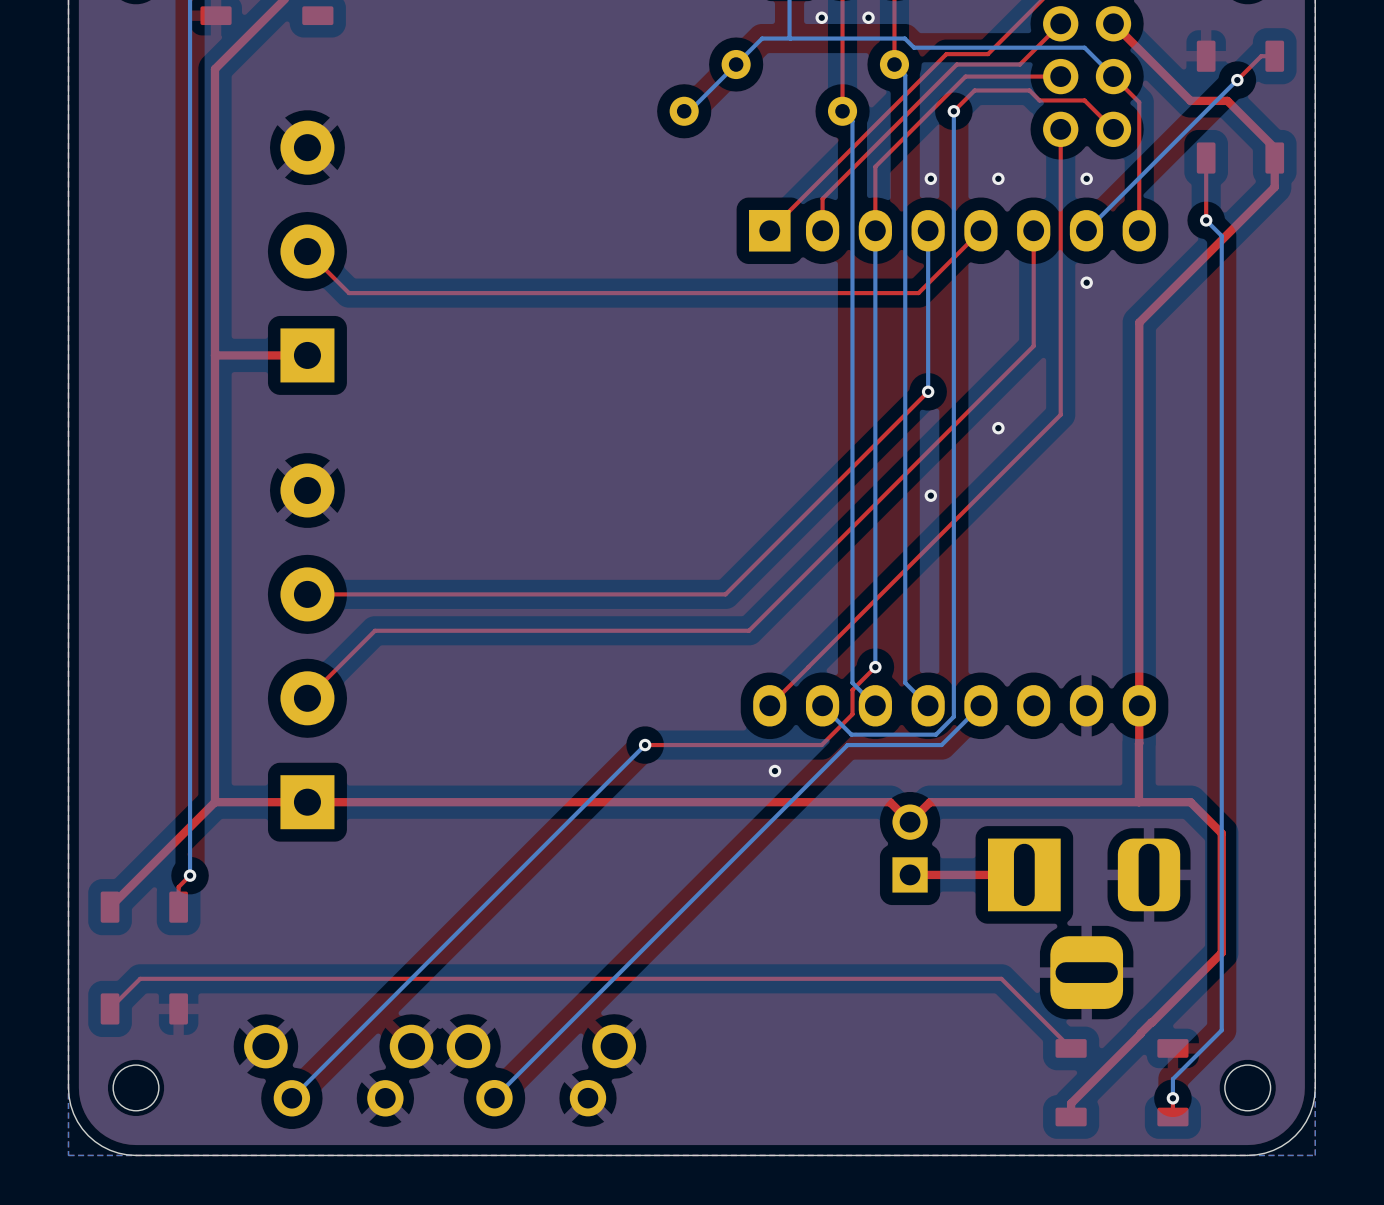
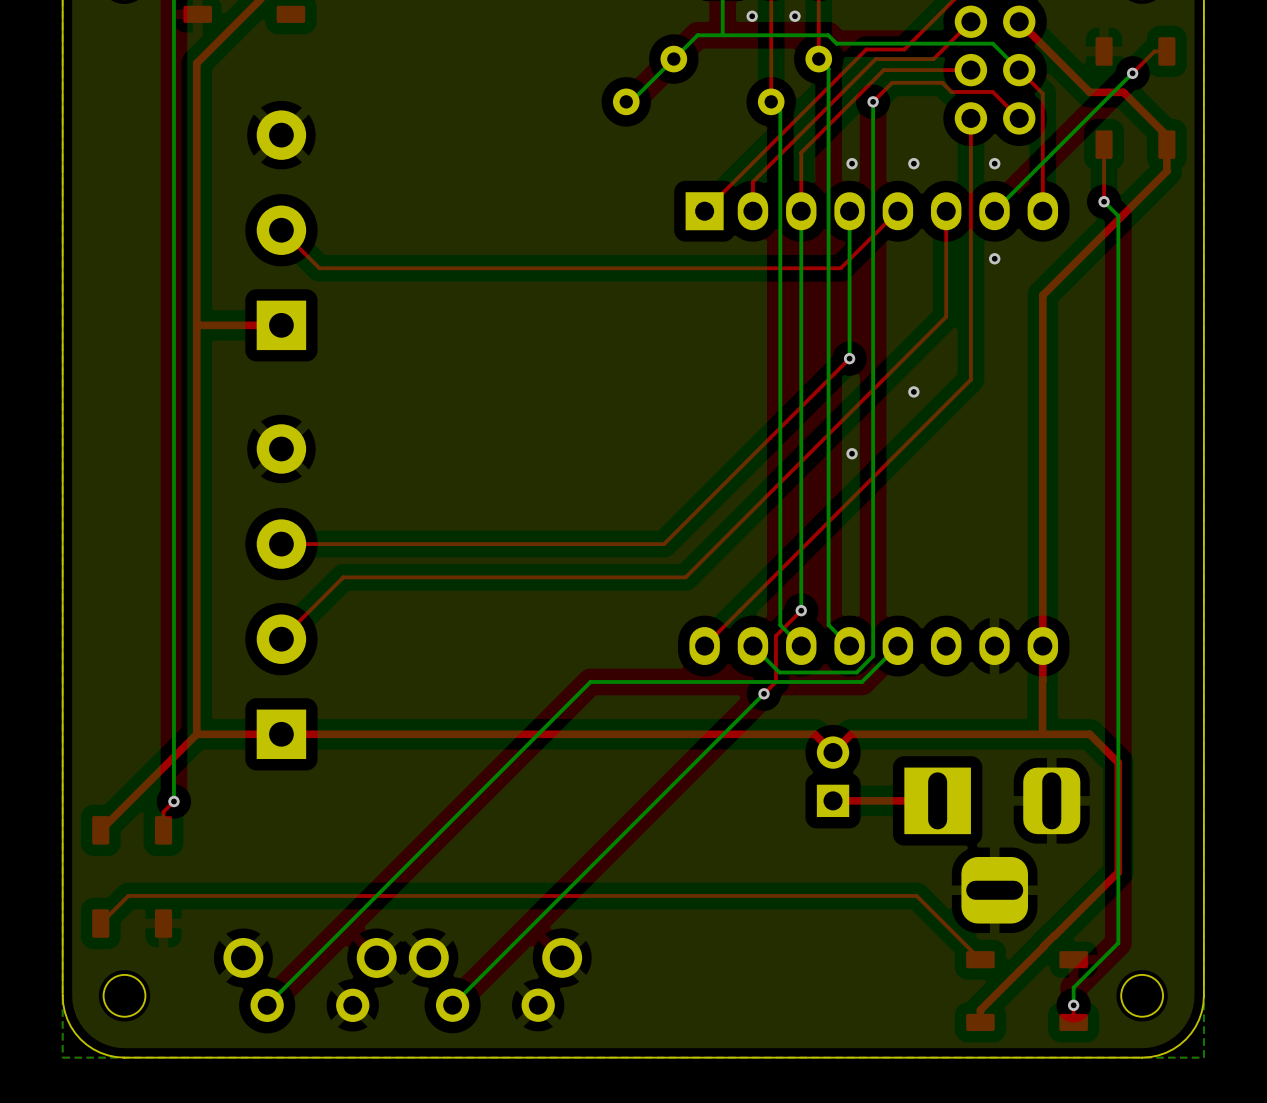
top track: (852, 689) (852, 714) (821, 745) (645, 745) -> (780, 631) (775, 635) (775, 681) (764, 693)
via: (645, 745) -> none
bottom track: (847, 745) (834, 757) -> (775, 681) (590, 681)
via position: (774, 771) -> (764, 693)

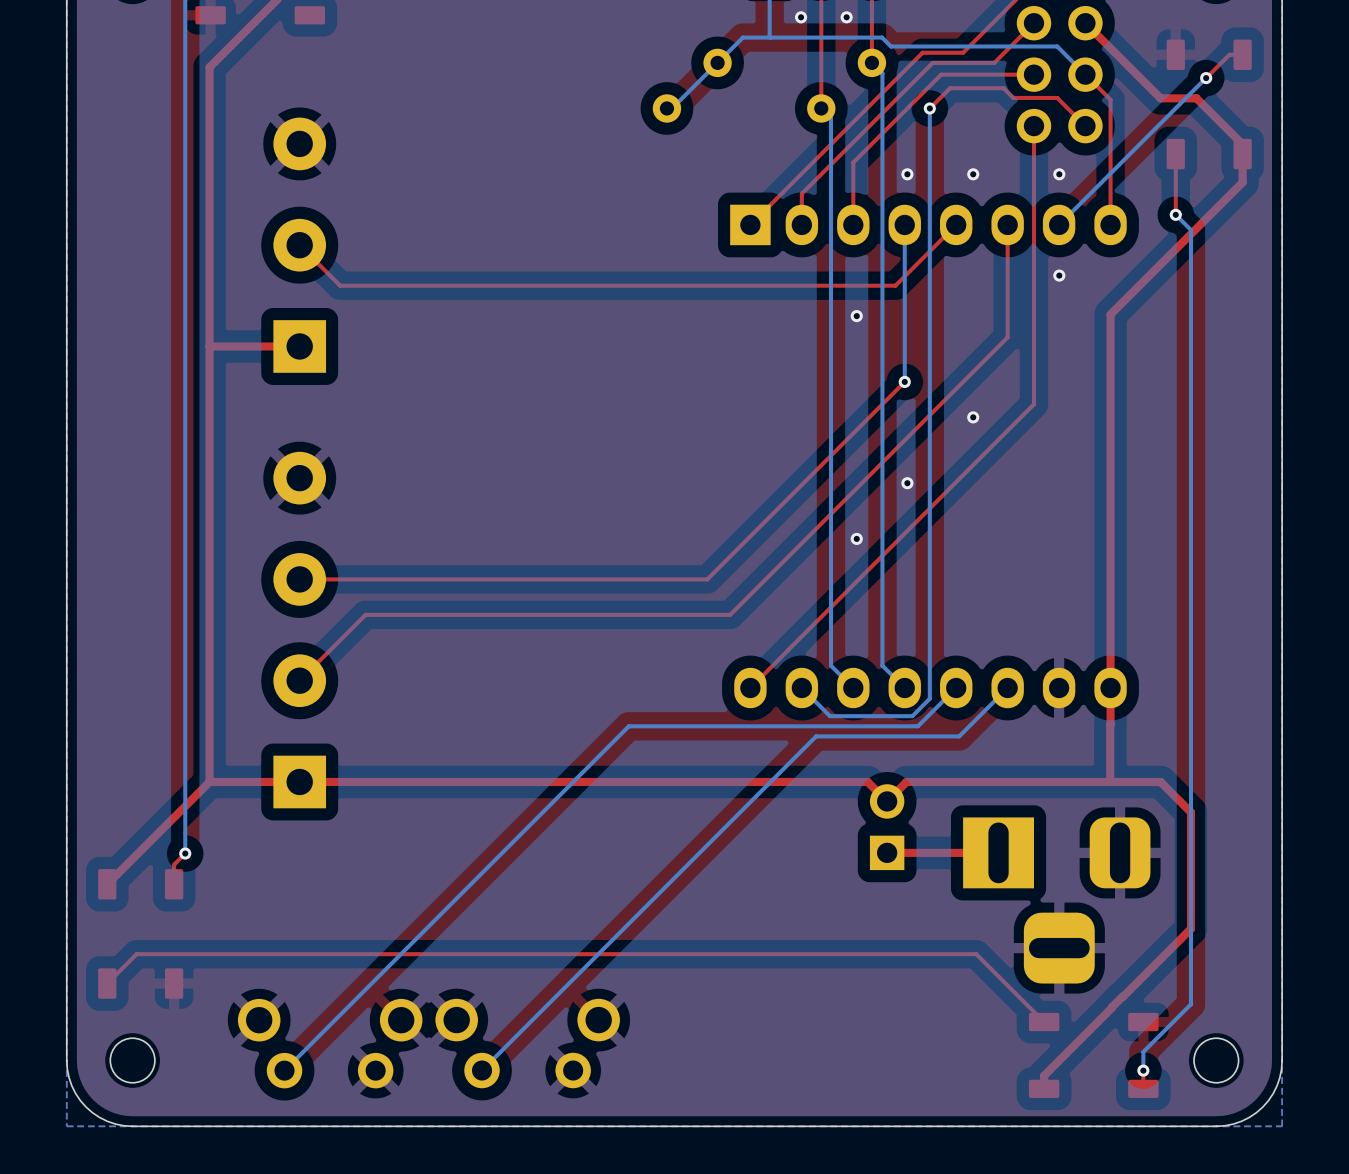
bottom track: (801, 211) (801, 610) -> none
via: none -> (856, 316)
via: none -> (856, 538)
top track: (801, 610) (775, 635) (775, 681) (764, 693) -> none
via: (801, 610) -> none
bottom track: none -> (1007, 688) (959, 736) (816, 736) (813, 738)
via: (764, 693) -> none

